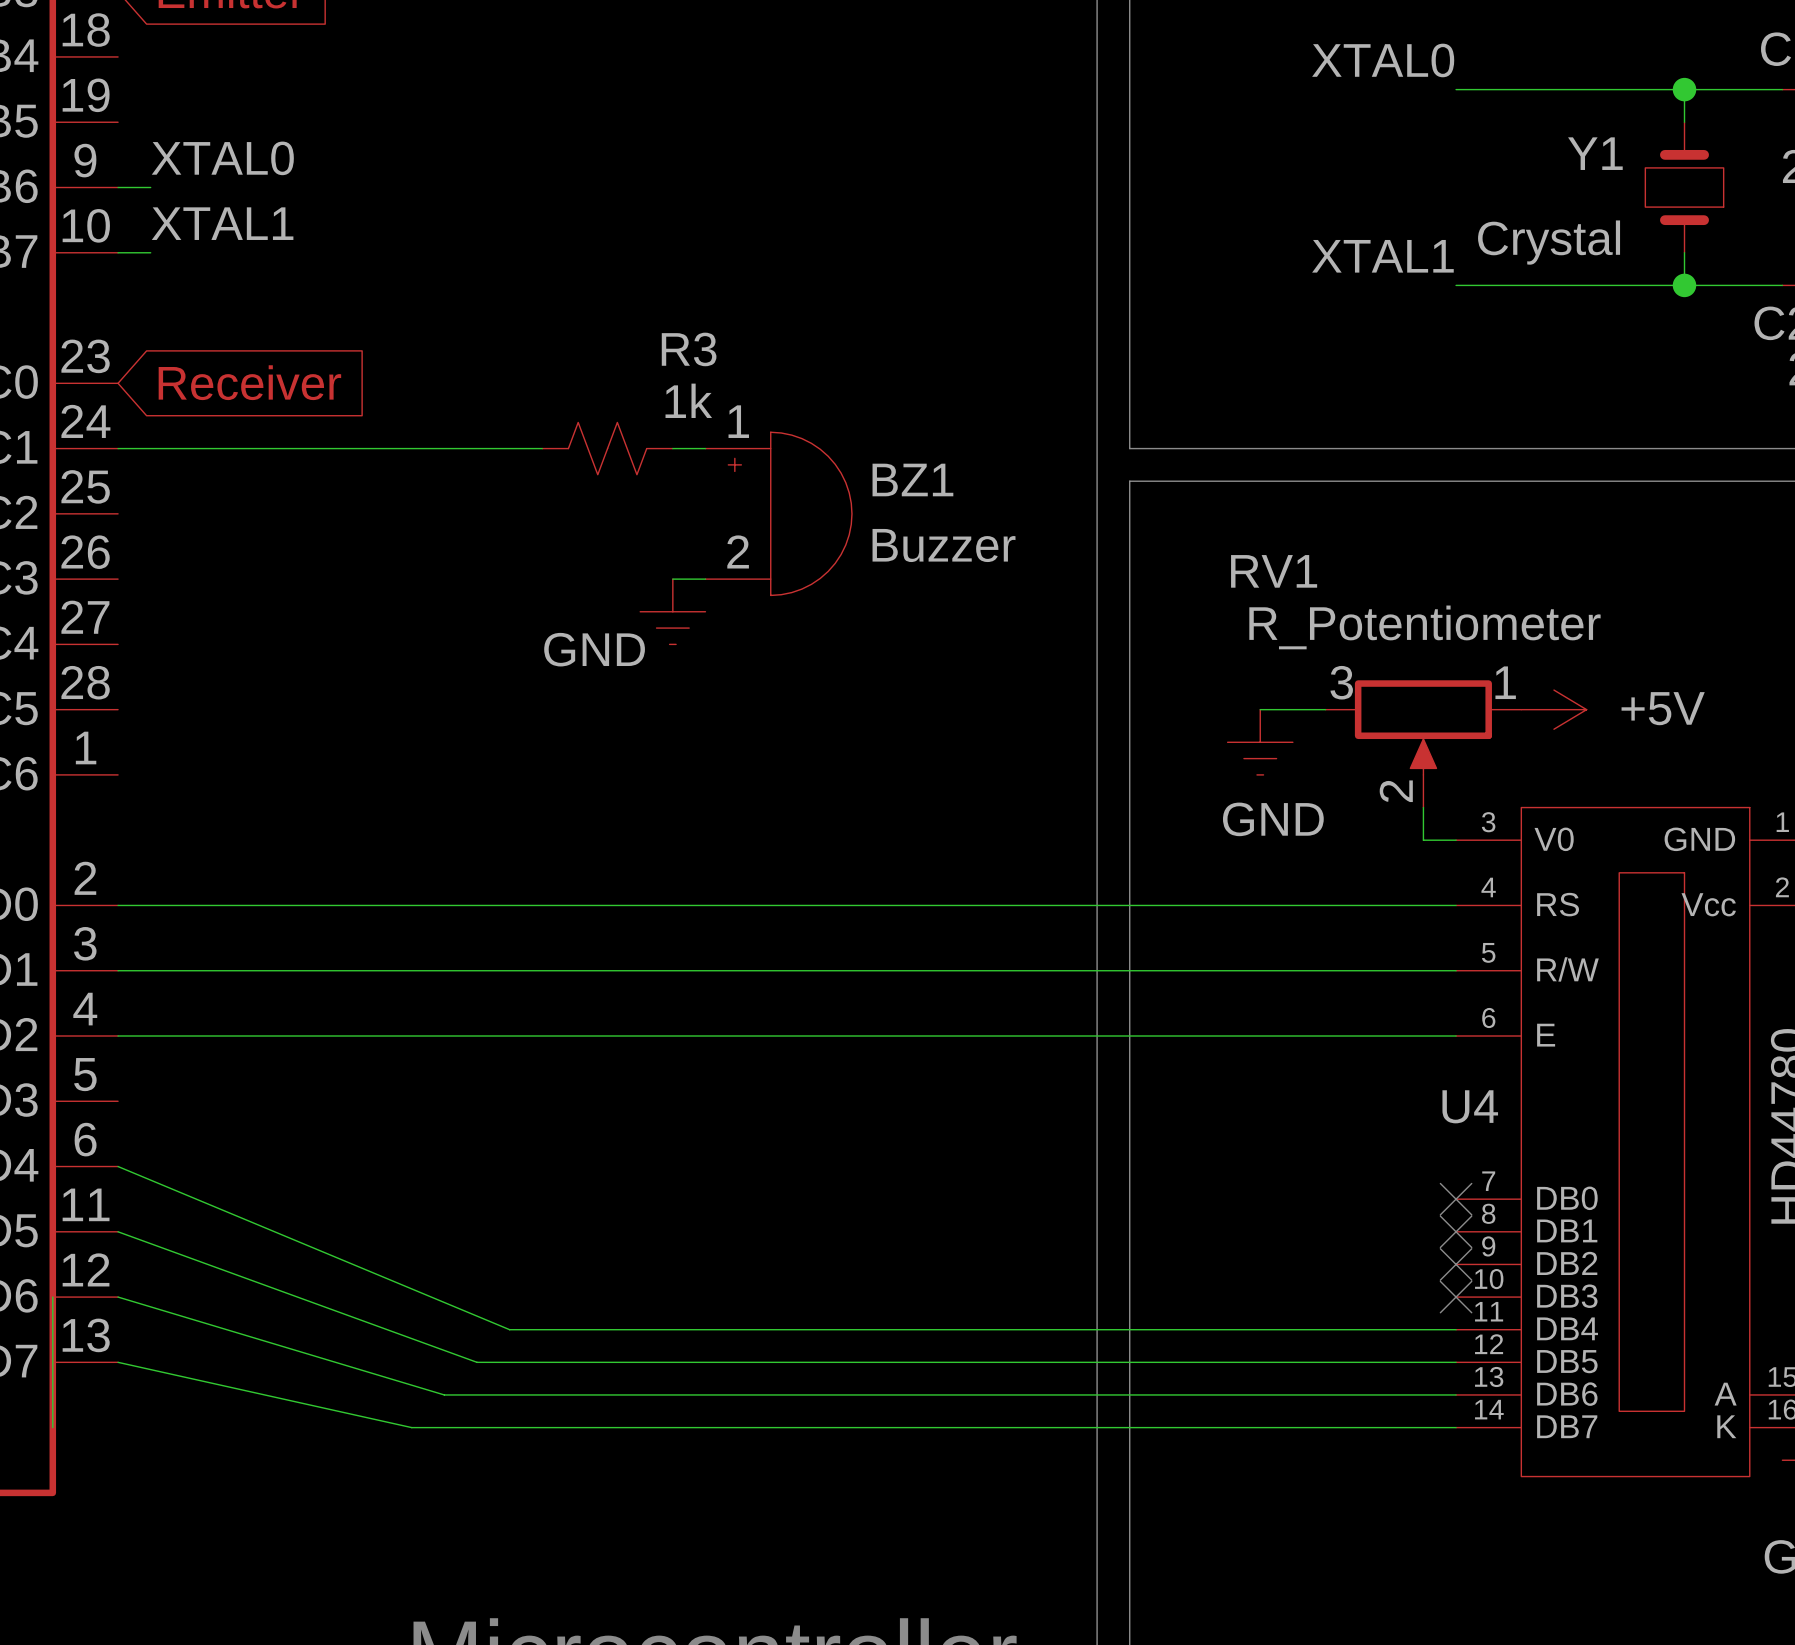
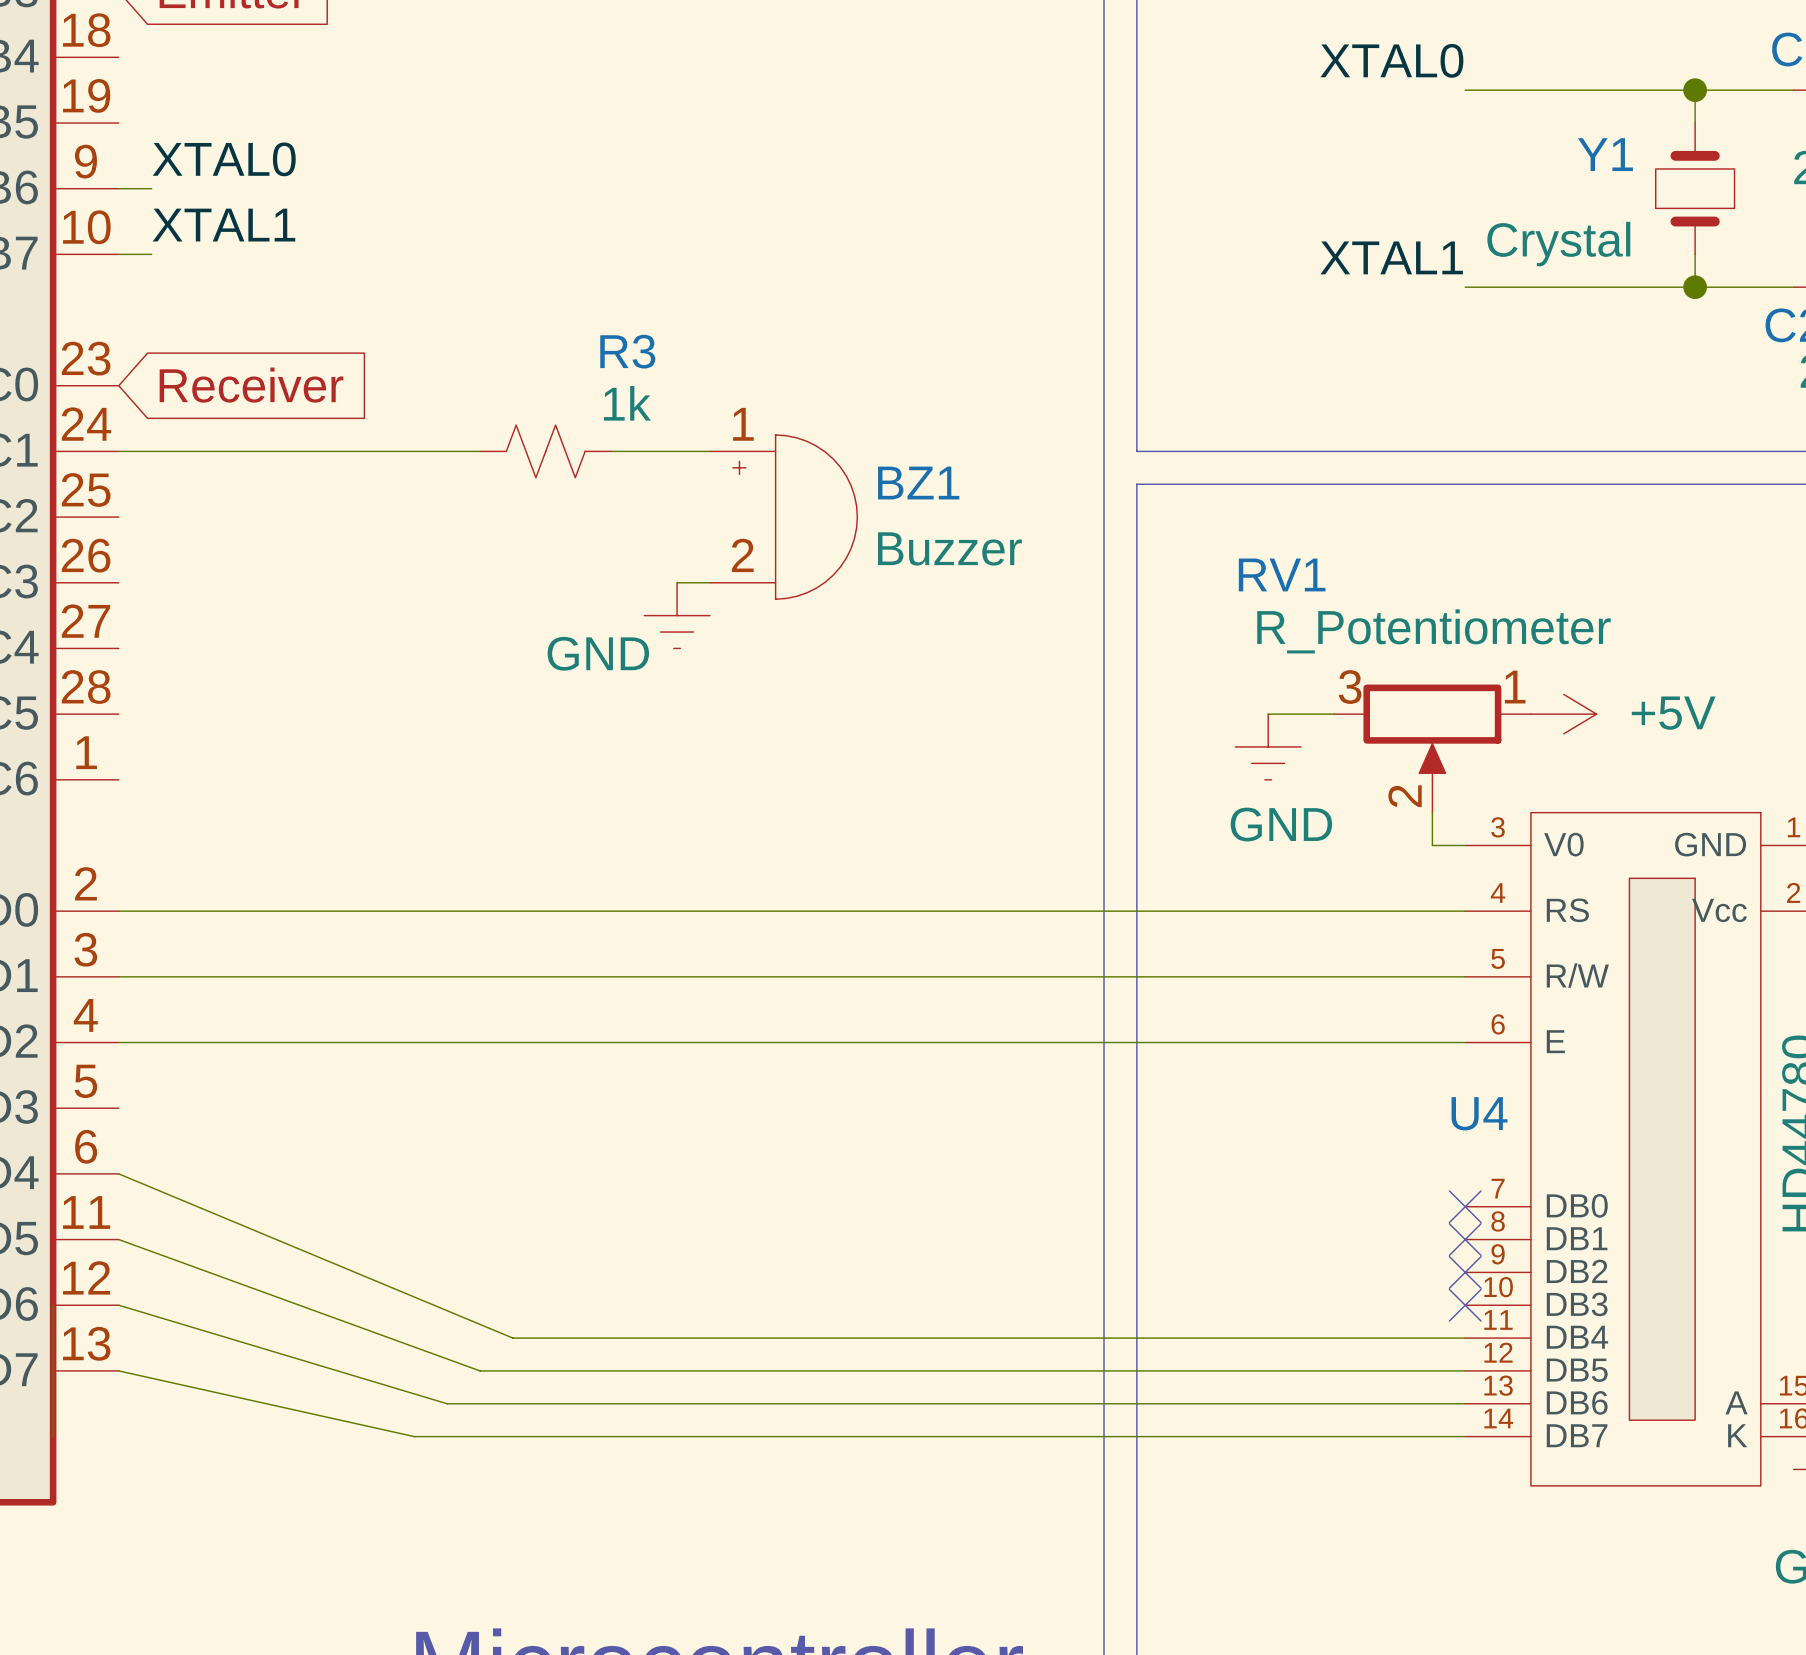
wire: (477, 448) (542, 448) -> (611, 451) (677, 451)
R3 position: (607, 448) -> (545, 451)

